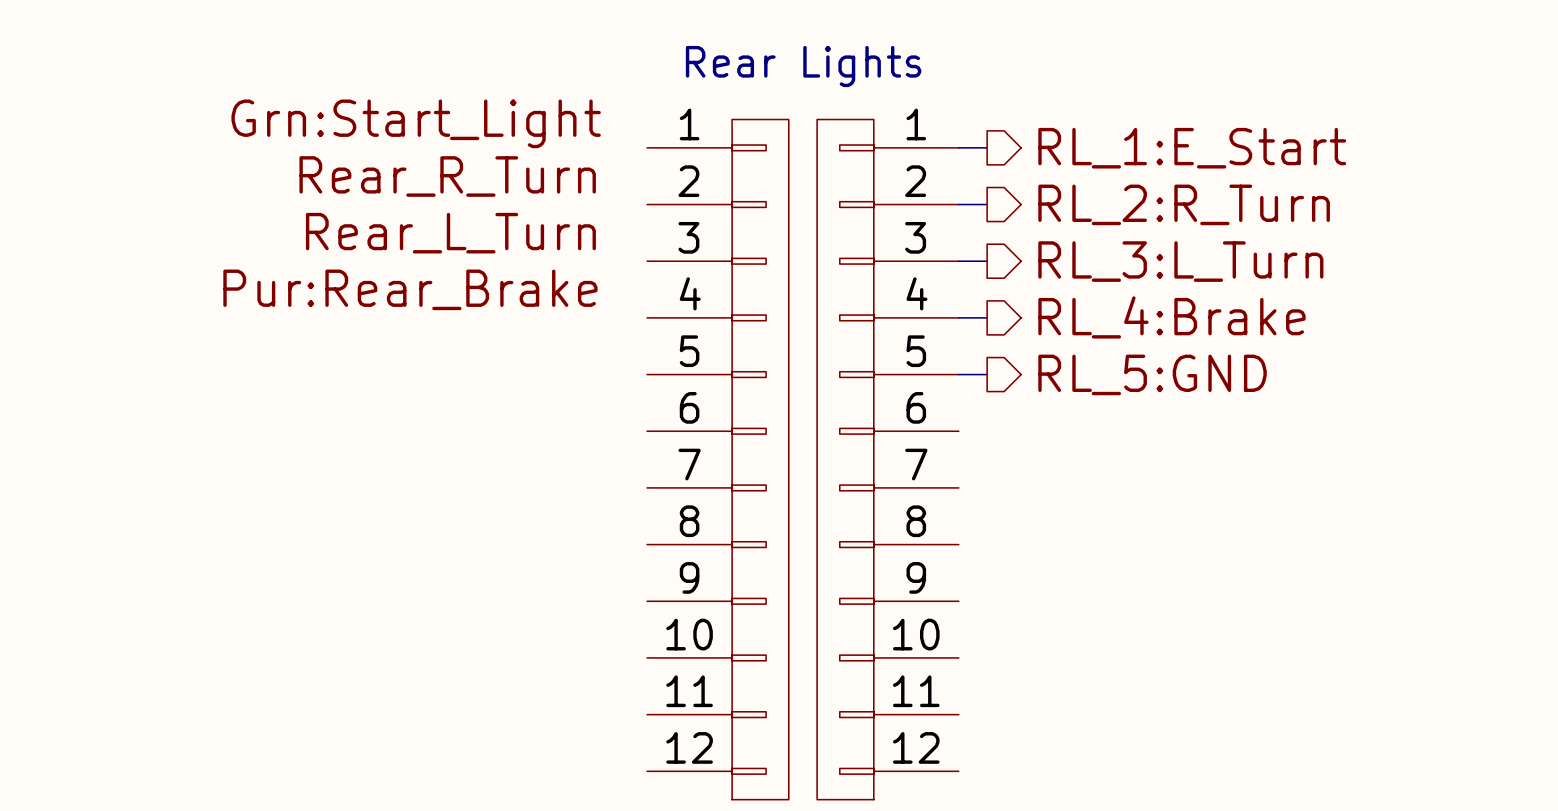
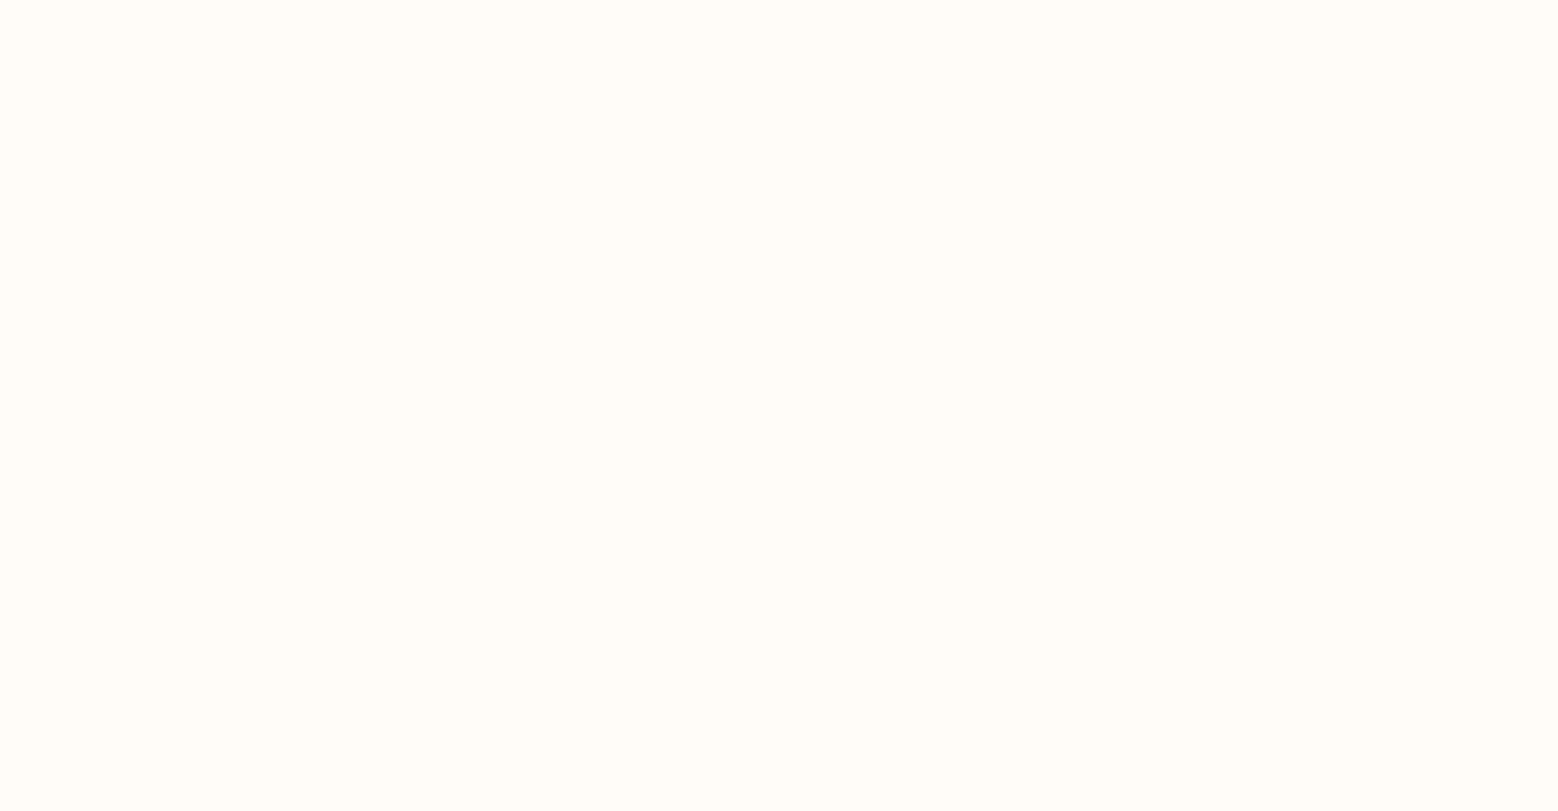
label: Grn:Start_Light (416, 123) -> none
wire: (958, 147) (987, 147) -> none
hierarchical label: RL_1:E_Start (1192, 148) -> none
label: Rear_R_Turn (447, 176) -> none
wire: (958, 204) (987, 204) -> none
hierarchical label: RL_2:R_Turn (1184, 204) -> none
label: Rear_L_Turn (450, 233) -> none
wire: (958, 261) (987, 261) -> none
hierarchical label: RL_3:L_Turn (1180, 261) -> none
label: Pur:Rear_Brake (410, 289) -> none
wire: (958, 317) (987, 317) -> none
hierarchical label: RL_4:Brake (1171, 317) -> none
wire: (958, 374) (987, 374) -> none
hierarchical label: RL_5:GND (1152, 374) -> none
part: Rear Lights (717, 459) -> none
part: (887, 459) -> none

